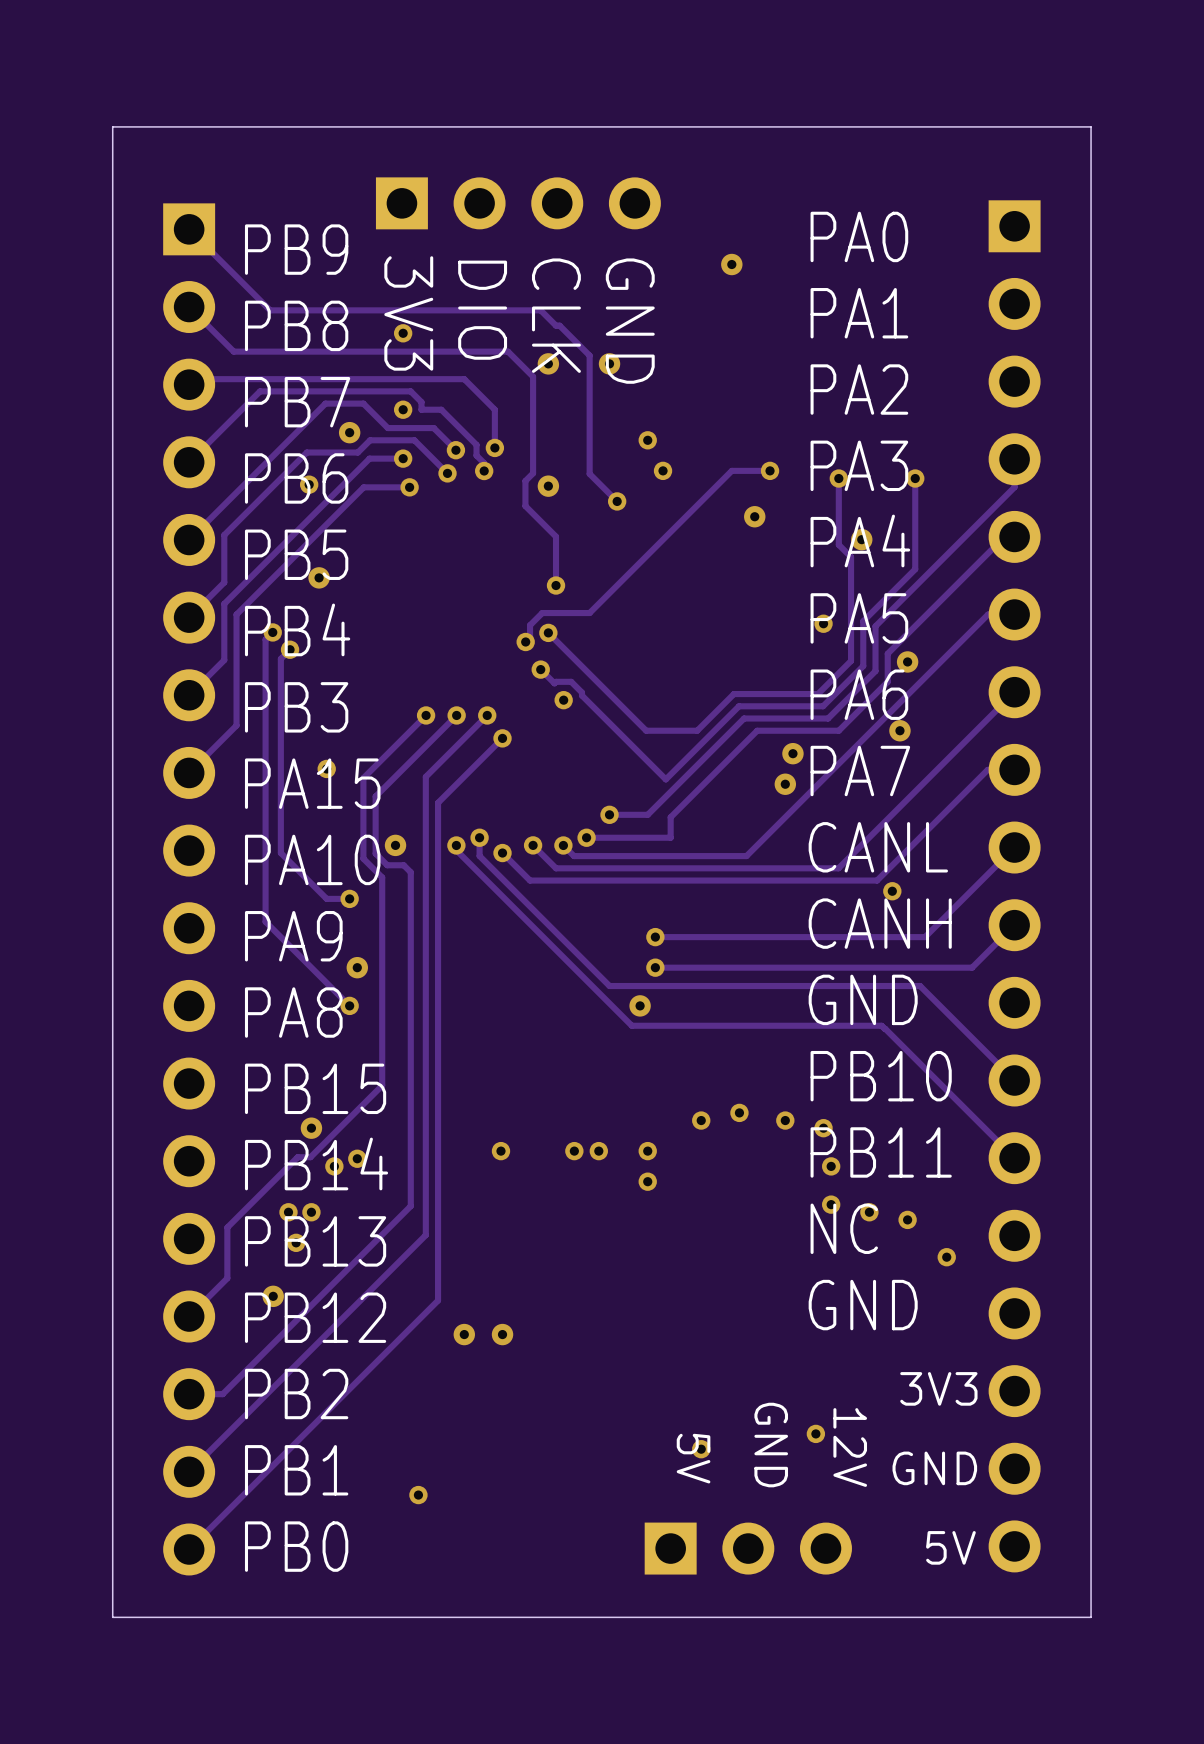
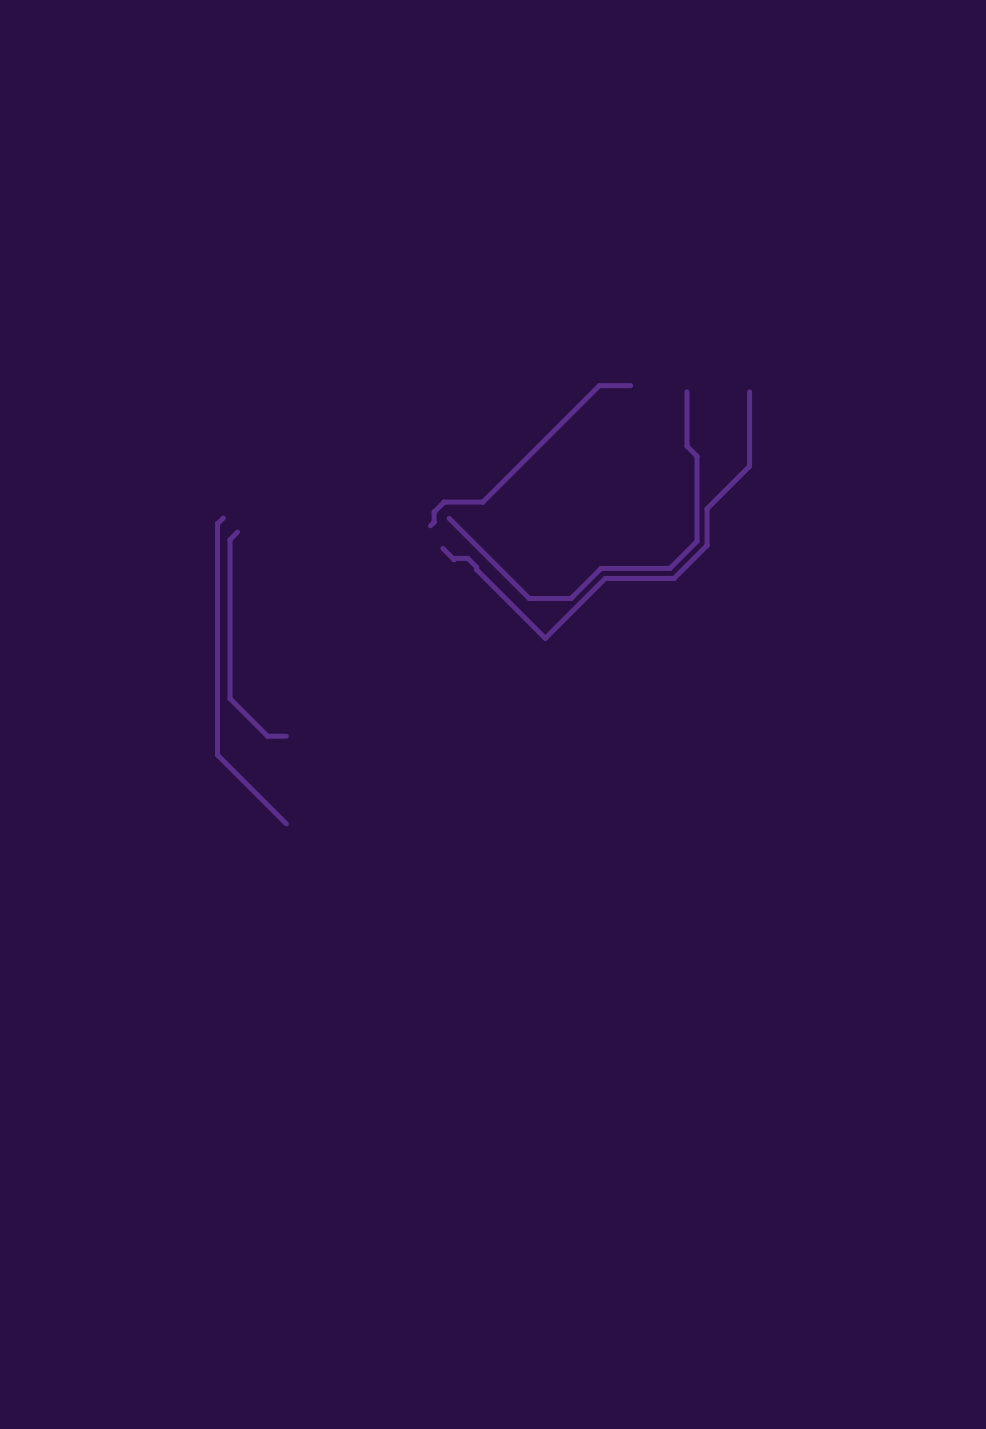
board edge: (1091, 126) (112, 126) (112, 1617) (1091, 1617) (1091, 126) -> none
part: (518, 203) -> none
track: (189, 229) (270, 310) (540, 310) (556, 325) (559, 325) (589, 355) (589, 473) (617, 501) -> none
text: PA0 (859, 236) -> none
text: PB9 (296, 249) -> none
via: (731, 264) -> none
track: (189, 307) (233, 351) (508, 351) (533, 376) (533, 473) (525, 480) (525, 506) (556, 536) (556, 585) -> none
text: DIO (482, 310) -> none
text: 3V3 (408, 313) -> none
text: PA1 (859, 313) -> none
text: CLK (556, 315) -> none
text: GND (630, 321) -> none
text: PB8 (296, 325) -> none
via: (403, 333) -> none
via: (548, 363) -> none
via: (609, 363) -> none
track: (189, 384) (194, 379) (464, 379) (494, 409) (494, 447) -> none
text: PA2 (859, 389) -> none
text: PB7 (297, 402) -> none
via: (403, 409) -> none
via: (349, 432) -> none
via: (647, 440) -> none
via: (494, 447) -> none
track: (455, 450) (433, 428) (387, 428) (363, 403) (325, 403) (189, 539) -> none
via: (455, 450) -> none
track: (403, 458) (369, 458) (224, 603) (224, 660) (189, 695) -> none
via: (403, 458) -> none
track: (1014, 459) (1014, 487) (875, 626) (875, 671) (828, 718) (744, 718) (647, 814) (609, 814) -> none
track: (189, 462) (260, 391) (410, 391) (421, 402) (421, 409) (441, 409) (476, 444) (476, 455) (484, 463) (484, 471) -> none
text: PA3 (859, 465) -> none
via: (663, 470) -> none
via: (770, 470) -> none
via: (484, 471) -> none
track: (447, 473) (414, 440) (370, 440) (357, 452) (306, 452) (224, 535) (224, 582) (189, 617) -> none
via: (447, 473) -> none
text: PB6 (296, 478) -> none
via: (838, 478) -> none
via: (915, 478) -> none
via: (309, 484) -> none
via: (548, 486) -> none
track: (409, 487) (363, 487) (236, 614) (236, 725) (189, 772) -> none
via: (409, 487) -> none
via: (617, 501) -> none
via: (754, 516) -> none
track: (1014, 536) (1004, 536) (887, 653) (887, 681) (838, 730) (757, 730) (670, 817) (670, 837) (586, 837) -> none
via: (861, 539) -> none
text: PA4 (860, 540) -> none
text: PB5 (296, 554) -> none
via: (319, 577) -> none
via: (556, 585) -> none
track: (1014, 614) (988, 614) (746, 856) (574, 856) (563, 845) -> none
text: PA5 (859, 618) -> none
via: (823, 623) -> none
text: PB4 (297, 629) -> none
via: (272, 632) -> none
via: (548, 632) -> none
via: (525, 641) -> none
via: (290, 649) -> none
via: (907, 661) -> none
via: (540, 669) -> none
track: (1014, 692) (838, 868) (556, 868) (533, 845) -> none
text: PA6 (859, 694) -> none
via: (563, 700) -> none
text: PB3 (296, 707) -> none
track: (426, 715) (363, 778) (363, 858) (382, 877) (382, 1085) (310, 1157) (297, 1157) (227, 1227) (227, 1278) (189, 1316) -> none
via: (426, 715) -> none
track: (456, 715) (375, 796) (375, 853) (387, 865) (403, 865) (410, 872) (410, 1206) (222, 1394) (189, 1394) -> none
via: (456, 715) -> none
track: (487, 715) (425, 776) (425, 1235) (189, 1471) -> none
via: (487, 715) -> none
via: (899, 730) -> none
track: (502, 738) (438, 802) (438, 1300) (189, 1549) -> none
via: (502, 738) -> none
via: (792, 753) -> none
via: (326, 768) -> none
track: (1014, 769) (987, 769) (877, 880) (530, 880) (502, 853) -> none
text: PA7 (860, 771) -> none
text: PA15 (312, 783) -> none
via: (785, 784) -> none
via: (609, 814) -> none
track: (479, 837) (479, 856) (609, 986) (920, 986) (1014, 1080) -> none
via: (479, 837) -> none
via: (586, 837) -> none
via: (395, 845) -> none
track: (456, 845) (456, 850) (631, 1025) (881, 1025) (884, 1028) -> none
via: (456, 845) -> none
via: (533, 845) -> none
via: (563, 845) -> none
text: CANL (878, 847) -> none
track: (1014, 847) (925, 937) (655, 937) -> none
via: (502, 853) -> none
text: PA10 (312, 859) -> none
part: (1014, 886) -> none
part: (189, 889) -> none
via: (892, 891) -> none
via: (349, 898) -> none
text: CANH (880, 923) -> none
track: (1014, 925) (972, 967) (655, 967) -> none
text: PA9 (293, 936) -> none
via: (655, 937) -> none
via: (357, 967) -> none
via: (655, 967) -> none
text: GND (863, 999) -> none
via: (349, 1005) -> none
via: (640, 1005) -> none
text: PA8 (293, 1012) -> none
track: (885, 1028) (1014, 1158) -> none
text: PB10 (881, 1076) -> none
text: PB15 (315, 1088) -> none
via: (739, 1112) -> none
via: (701, 1120) -> none
via: (785, 1120) -> none
via: (311, 1128) -> none
via: (823, 1128) -> none
via: (500, 1151) -> none
via: (574, 1151) -> none
via: (598, 1151) -> none
via: (647, 1151) -> none
text: PB11 (881, 1152) -> none
via: (357, 1158) -> none
text: PB14 (316, 1163) -> none
via: (334, 1166) -> none
via: (831, 1166) -> none
via: (647, 1181) -> none
via: (831, 1204) -> none
via: (288, 1212) -> none
via: (311, 1212) -> none
via: (869, 1212) -> none
via: (907, 1219) -> none
text: NC (844, 1228) -> none
text: PB13 (315, 1241) -> none
via: (296, 1242) -> none
via: (946, 1257) -> none
via: (273, 1296) -> none
text: GND (863, 1305) -> none
text: PB12 (315, 1317) -> none
via: (464, 1334) -> none
via: (502, 1334) -> none
text: 3V3 (938, 1388) -> none
text: PB2 (296, 1393) -> none
via: (815, 1433) -> none
text: GND (771, 1445) -> none
text: 12V (850, 1447) -> none
via: (701, 1449) -> none
text: 5V (693, 1458) -> none
text: GND (934, 1468) -> none
text: PB1 (296, 1470) -> none
via: (418, 1495) -> none
text: PB0 (296, 1546) -> none
text: 5V (950, 1547) -> none
part: (748, 1548) -> none

